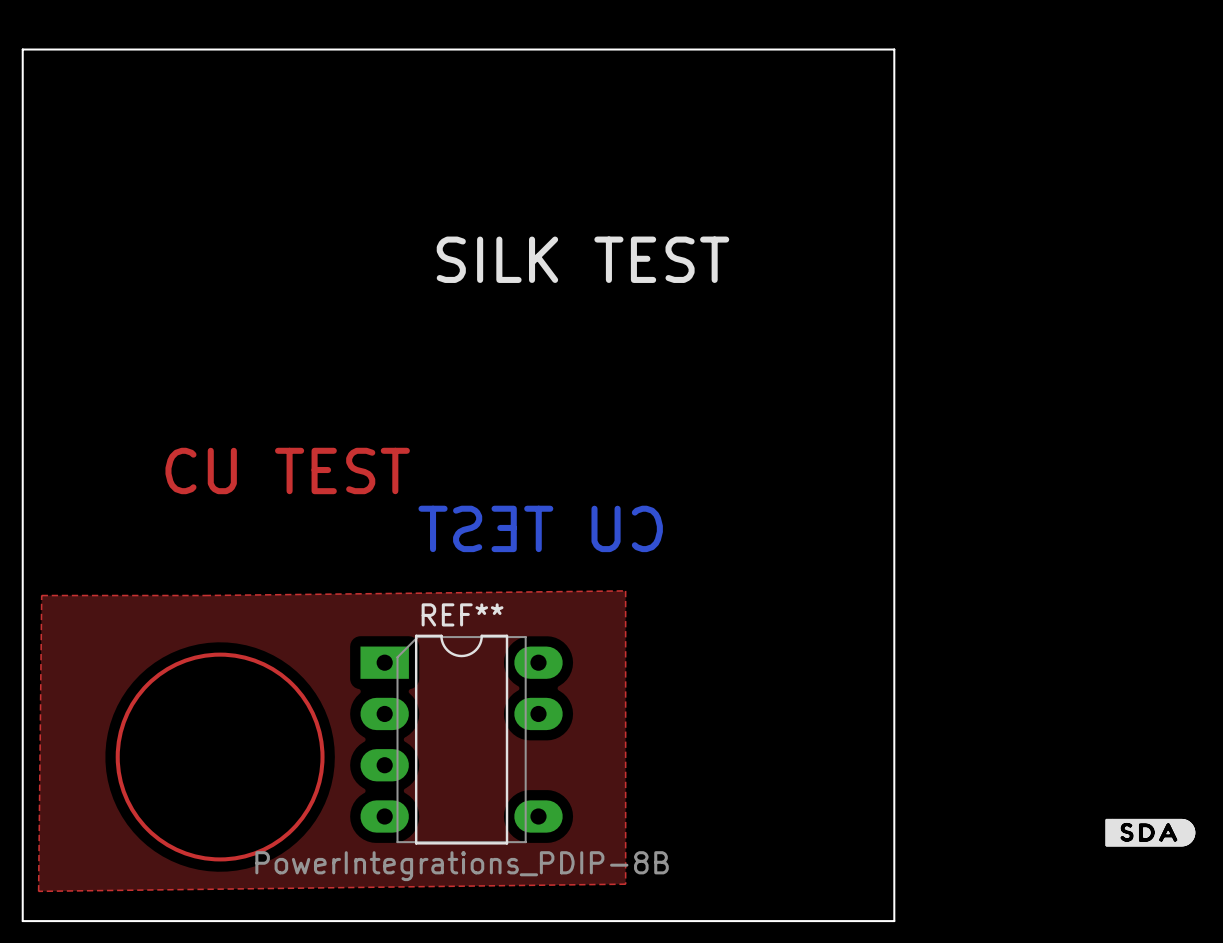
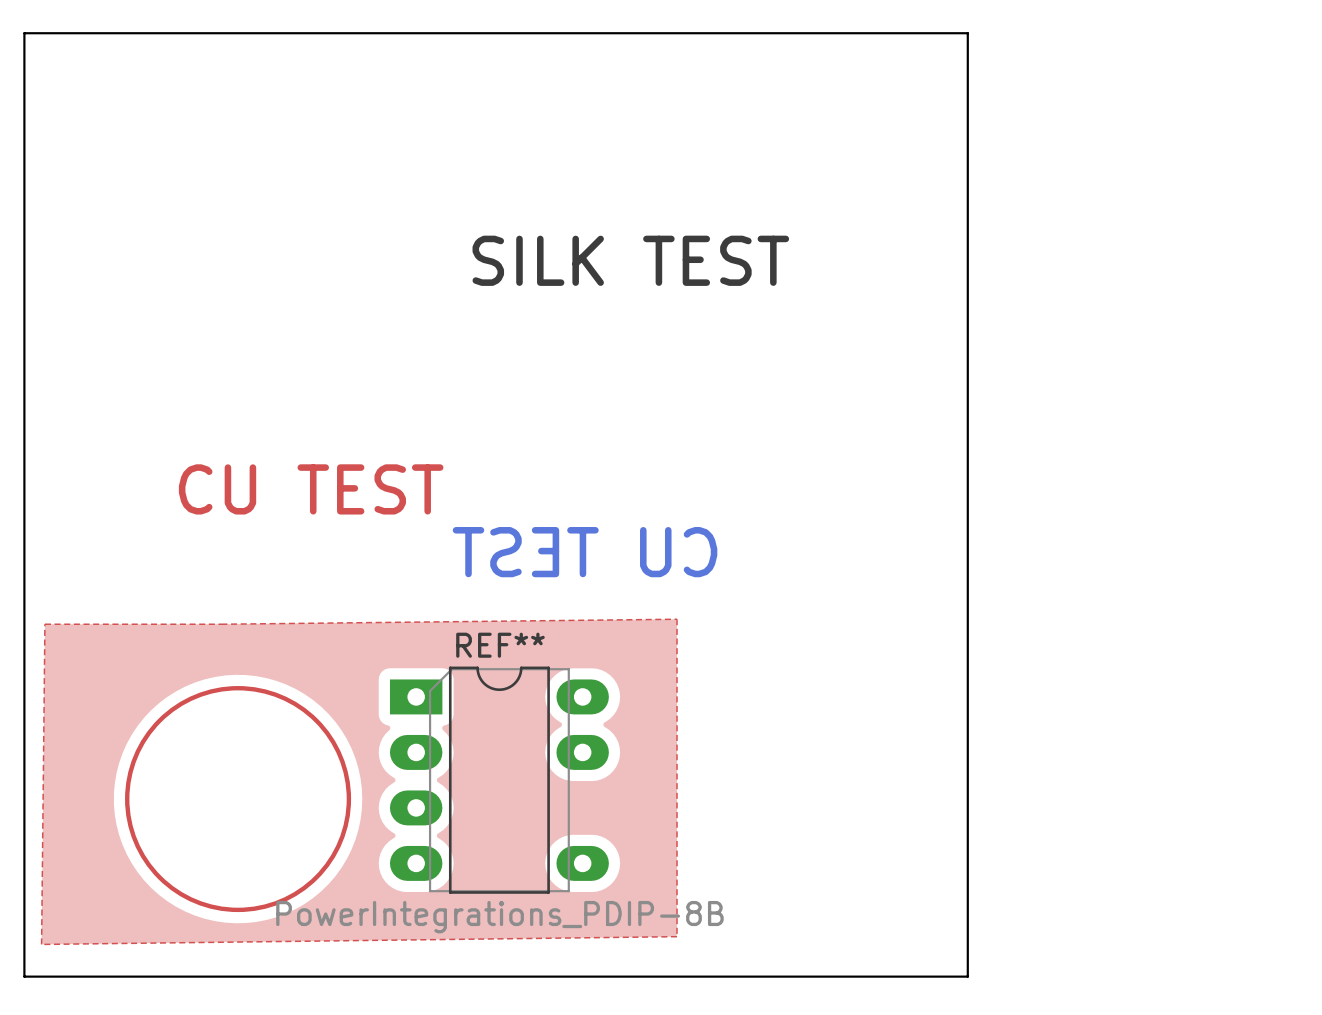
drawing: [1105, 818, 1196, 847] -> none

